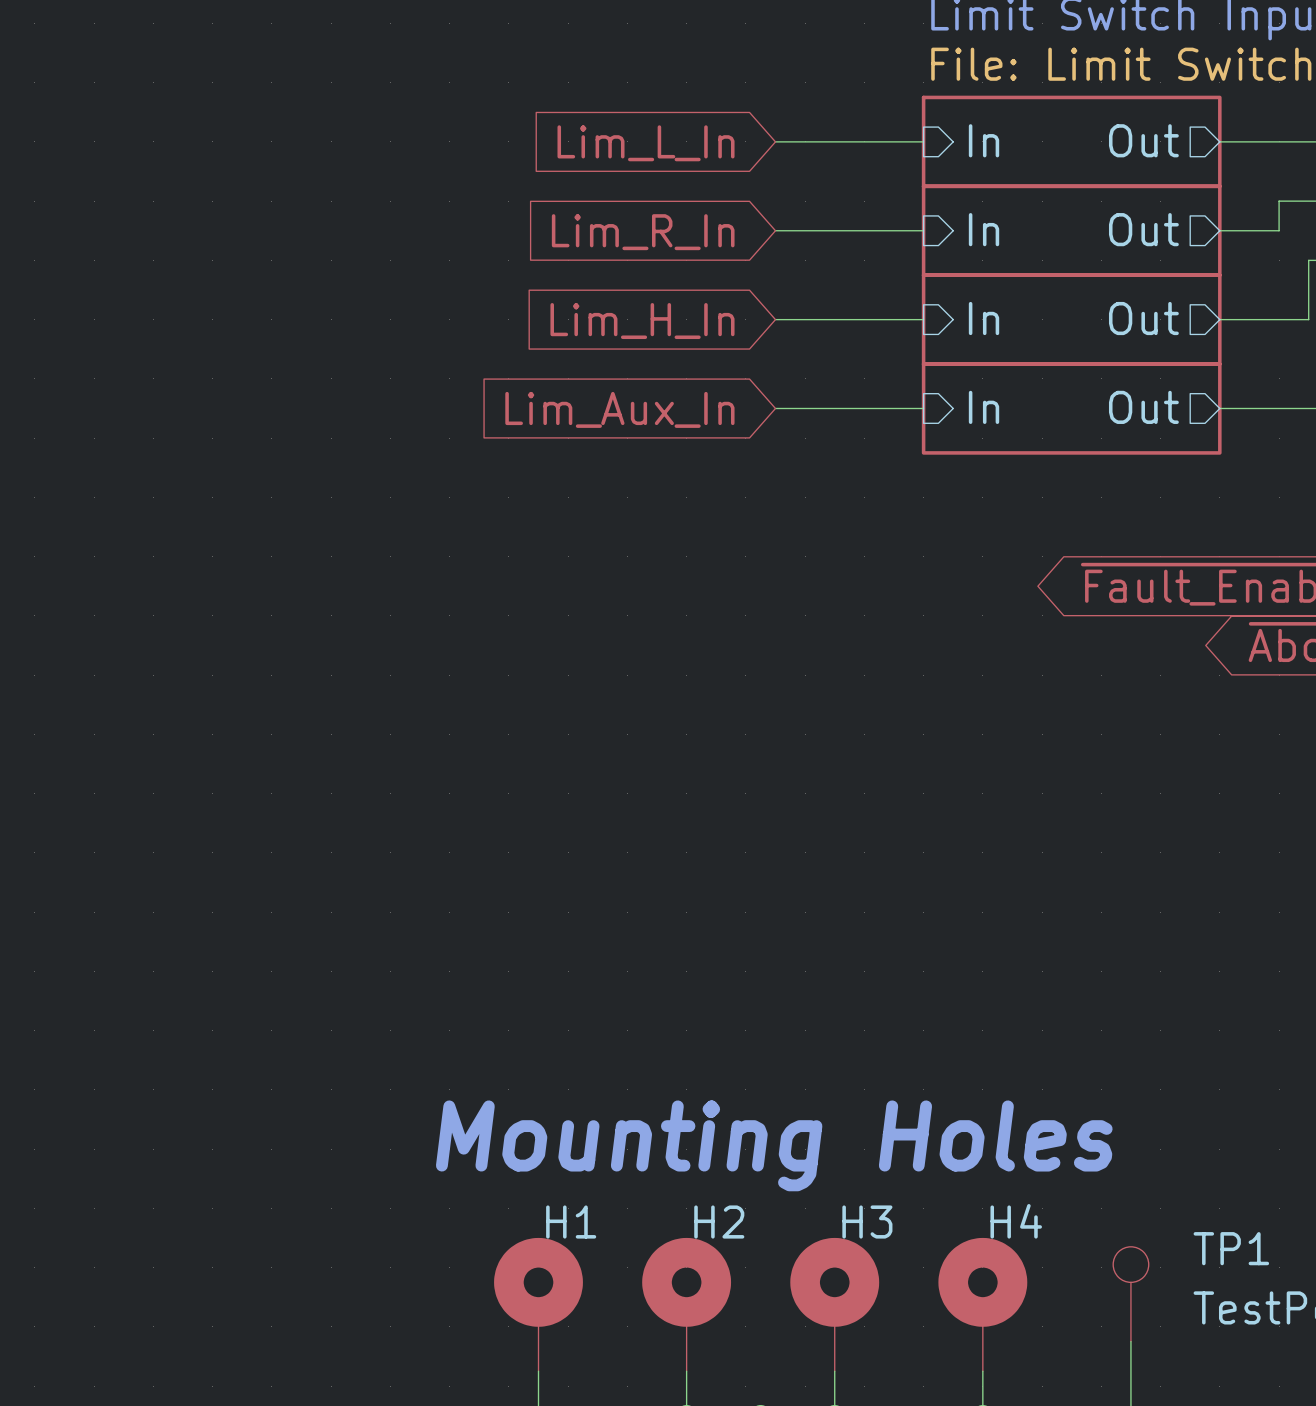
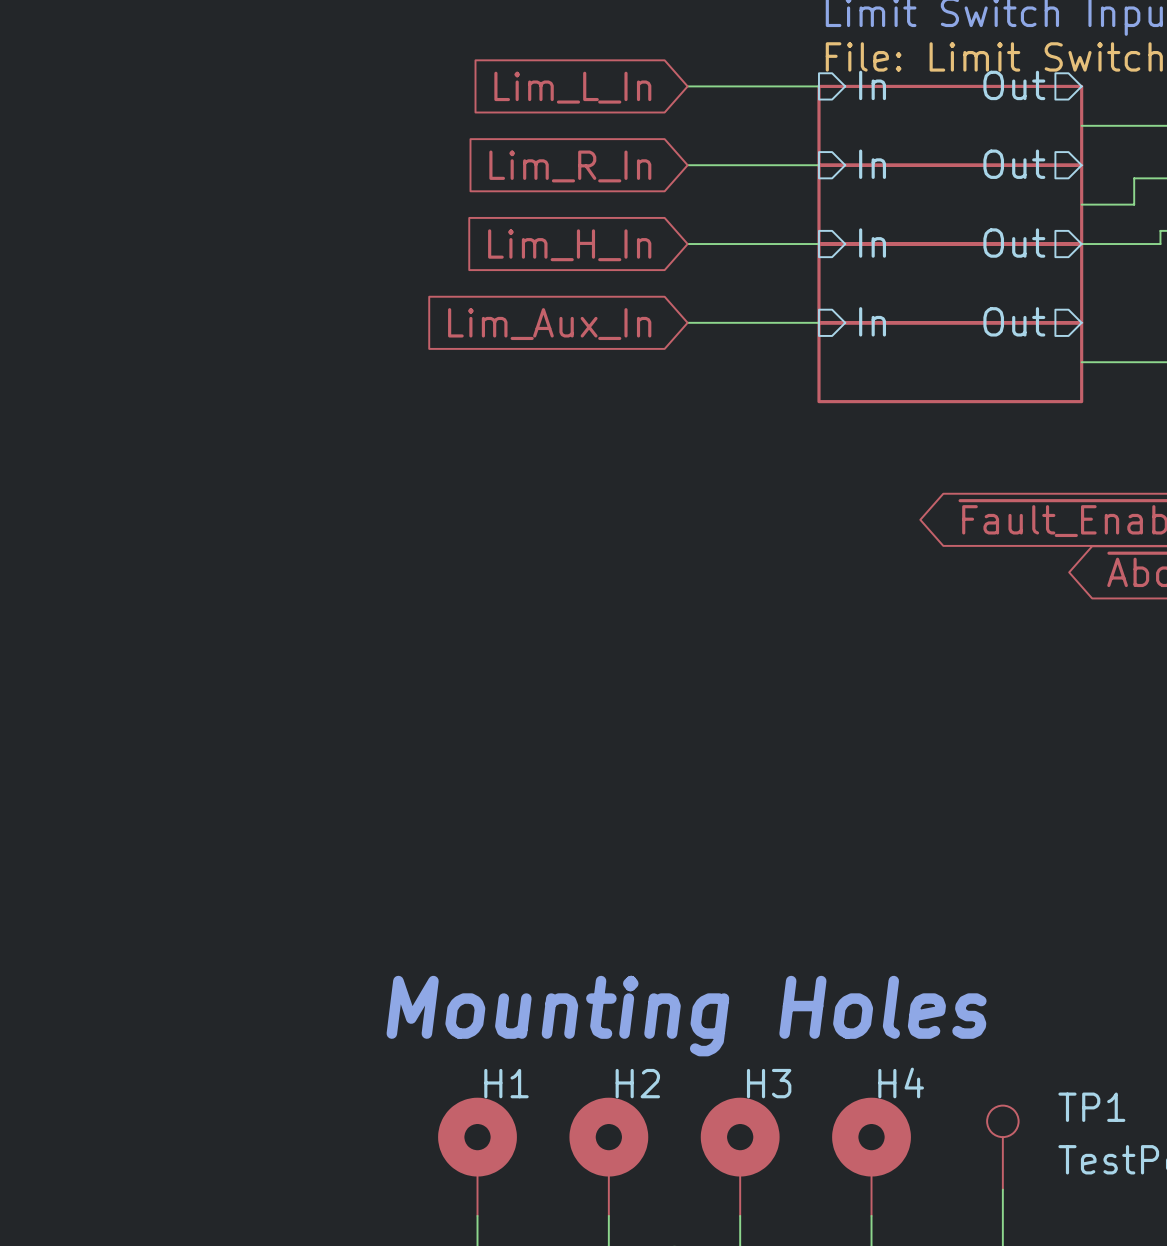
sheet pin: none -> In (872, 85)
sheet pin: none -> Out (1014, 85)
sheet pin: In (984, 140) -> none
sheet pin: Out (1143, 140) -> none
wire: (775, 141) (923, 141) -> (687, 86) (818, 86)
global label position: Lim_L_In (646, 143) -> Lim_L_In (572, 87)
sheet pin: none -> In (872, 164)
sheet pin: none -> Out (1014, 164)
sheet pin: In (984, 229) -> none
sheet pin: Out (1143, 229) -> none
wire: (775, 230) (923, 230) -> (687, 165) (818, 165)
global label position: Lim_R_In (643, 232) -> Lim_R_In (570, 166)
sheet pin: none -> In (872, 243)
sheet pin: none -> Out (1014, 243)
wire: (1308, 275) (1308, 319) (1219, 319) -> (1160, 244) (1081, 244)
sheet pin: In (984, 318) -> none
sheet pin: Out (1143, 318) -> none
wire: (775, 319) (923, 319) -> (687, 244) (818, 244)
global label position: Lim_H_In (642, 321) -> Lim_H_In (569, 245)
sheet pin: none -> In (872, 321)
sheet pin: none -> Out (1014, 321)
sheet pin: In (984, 407) -> none
sheet pin: Out (1143, 407) -> none
wire: (775, 408) (923, 408) -> (687, 322) (818, 322)
global label position: Lim_Aux_In (619, 409) -> Lim_Aux_In (549, 324)

